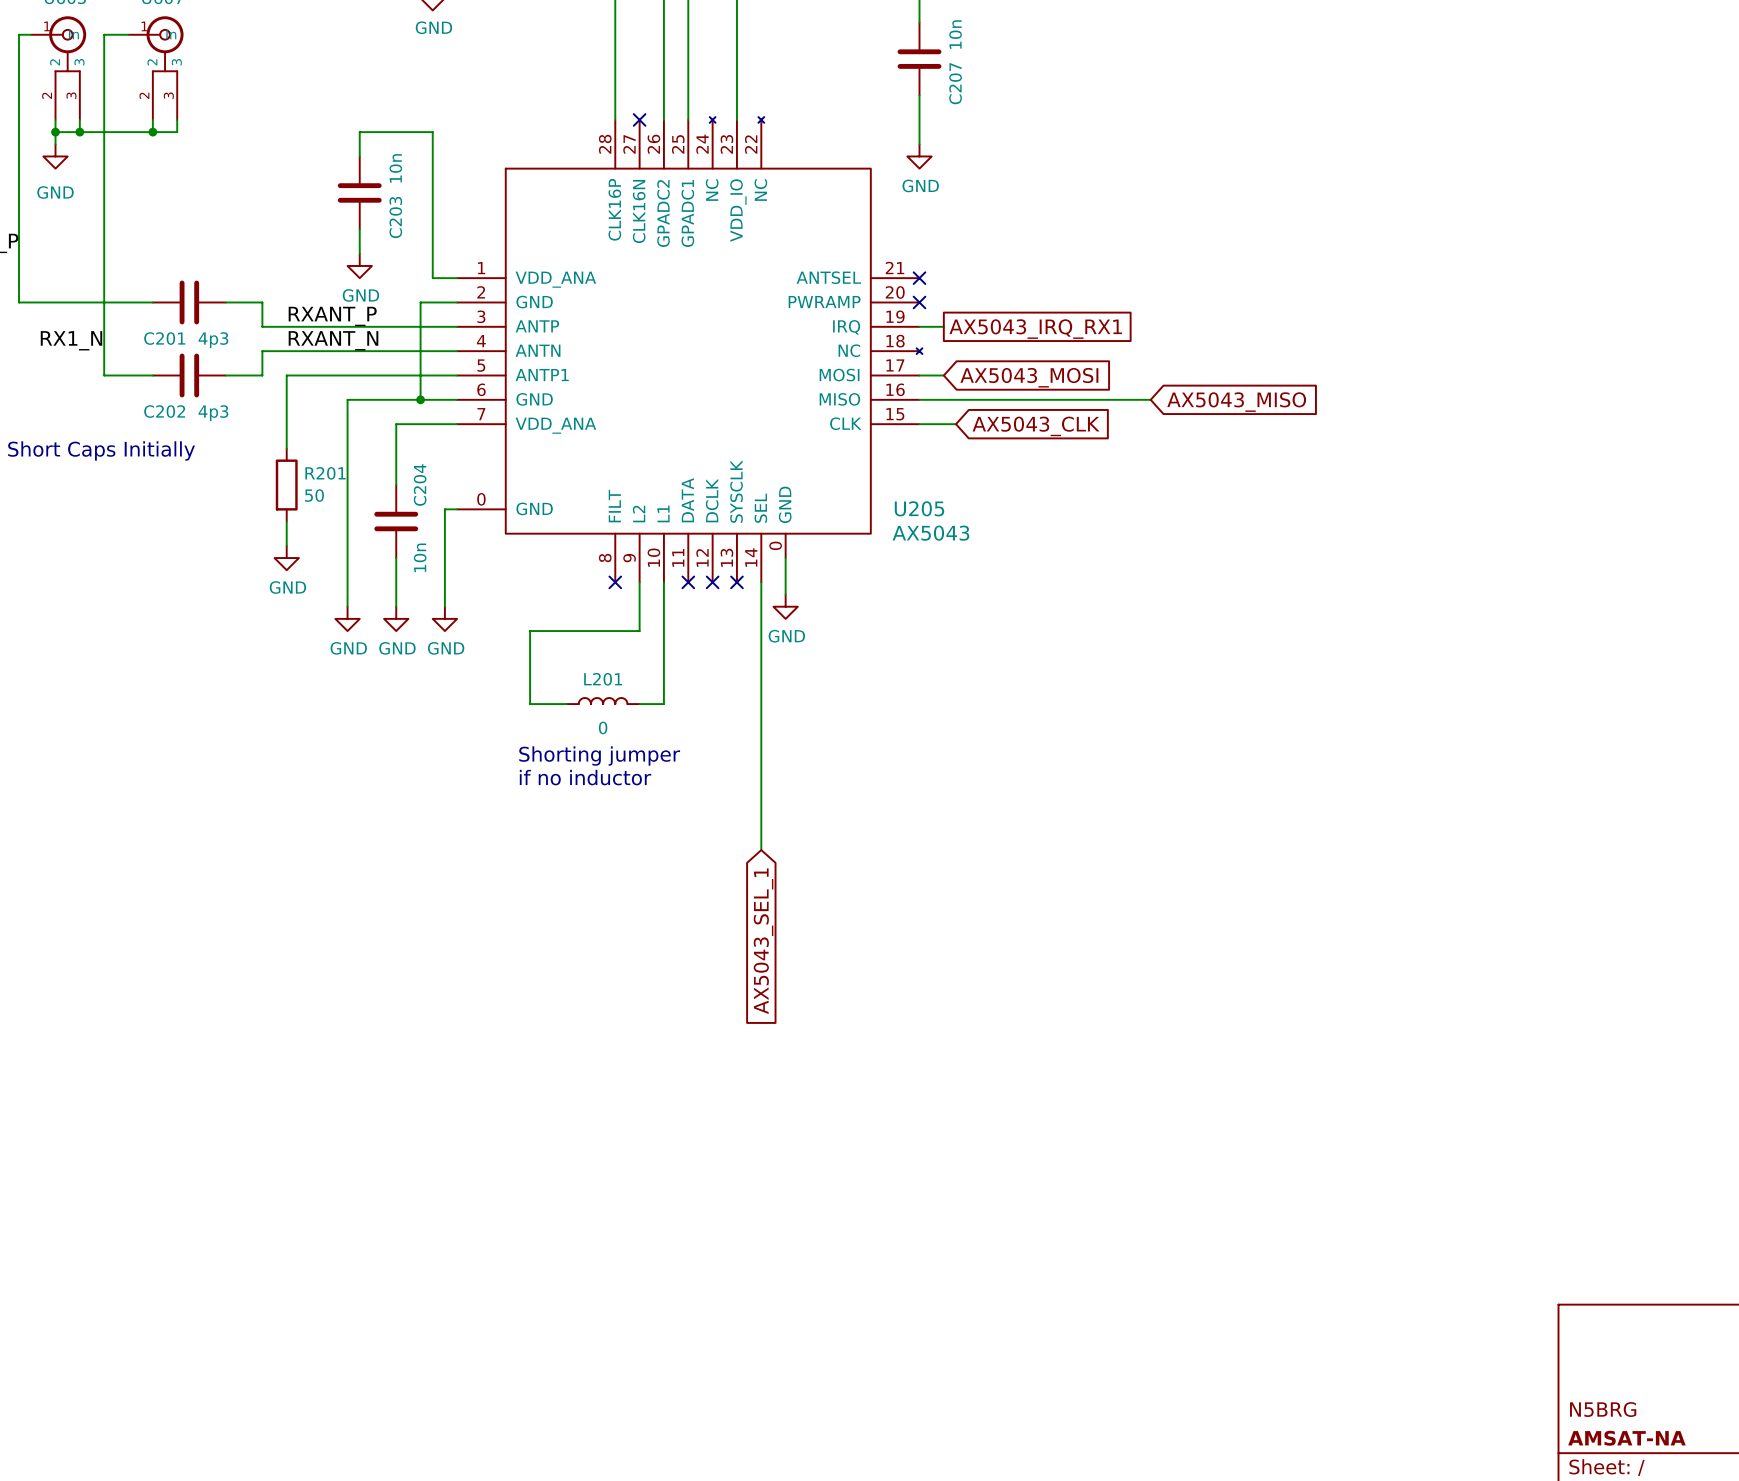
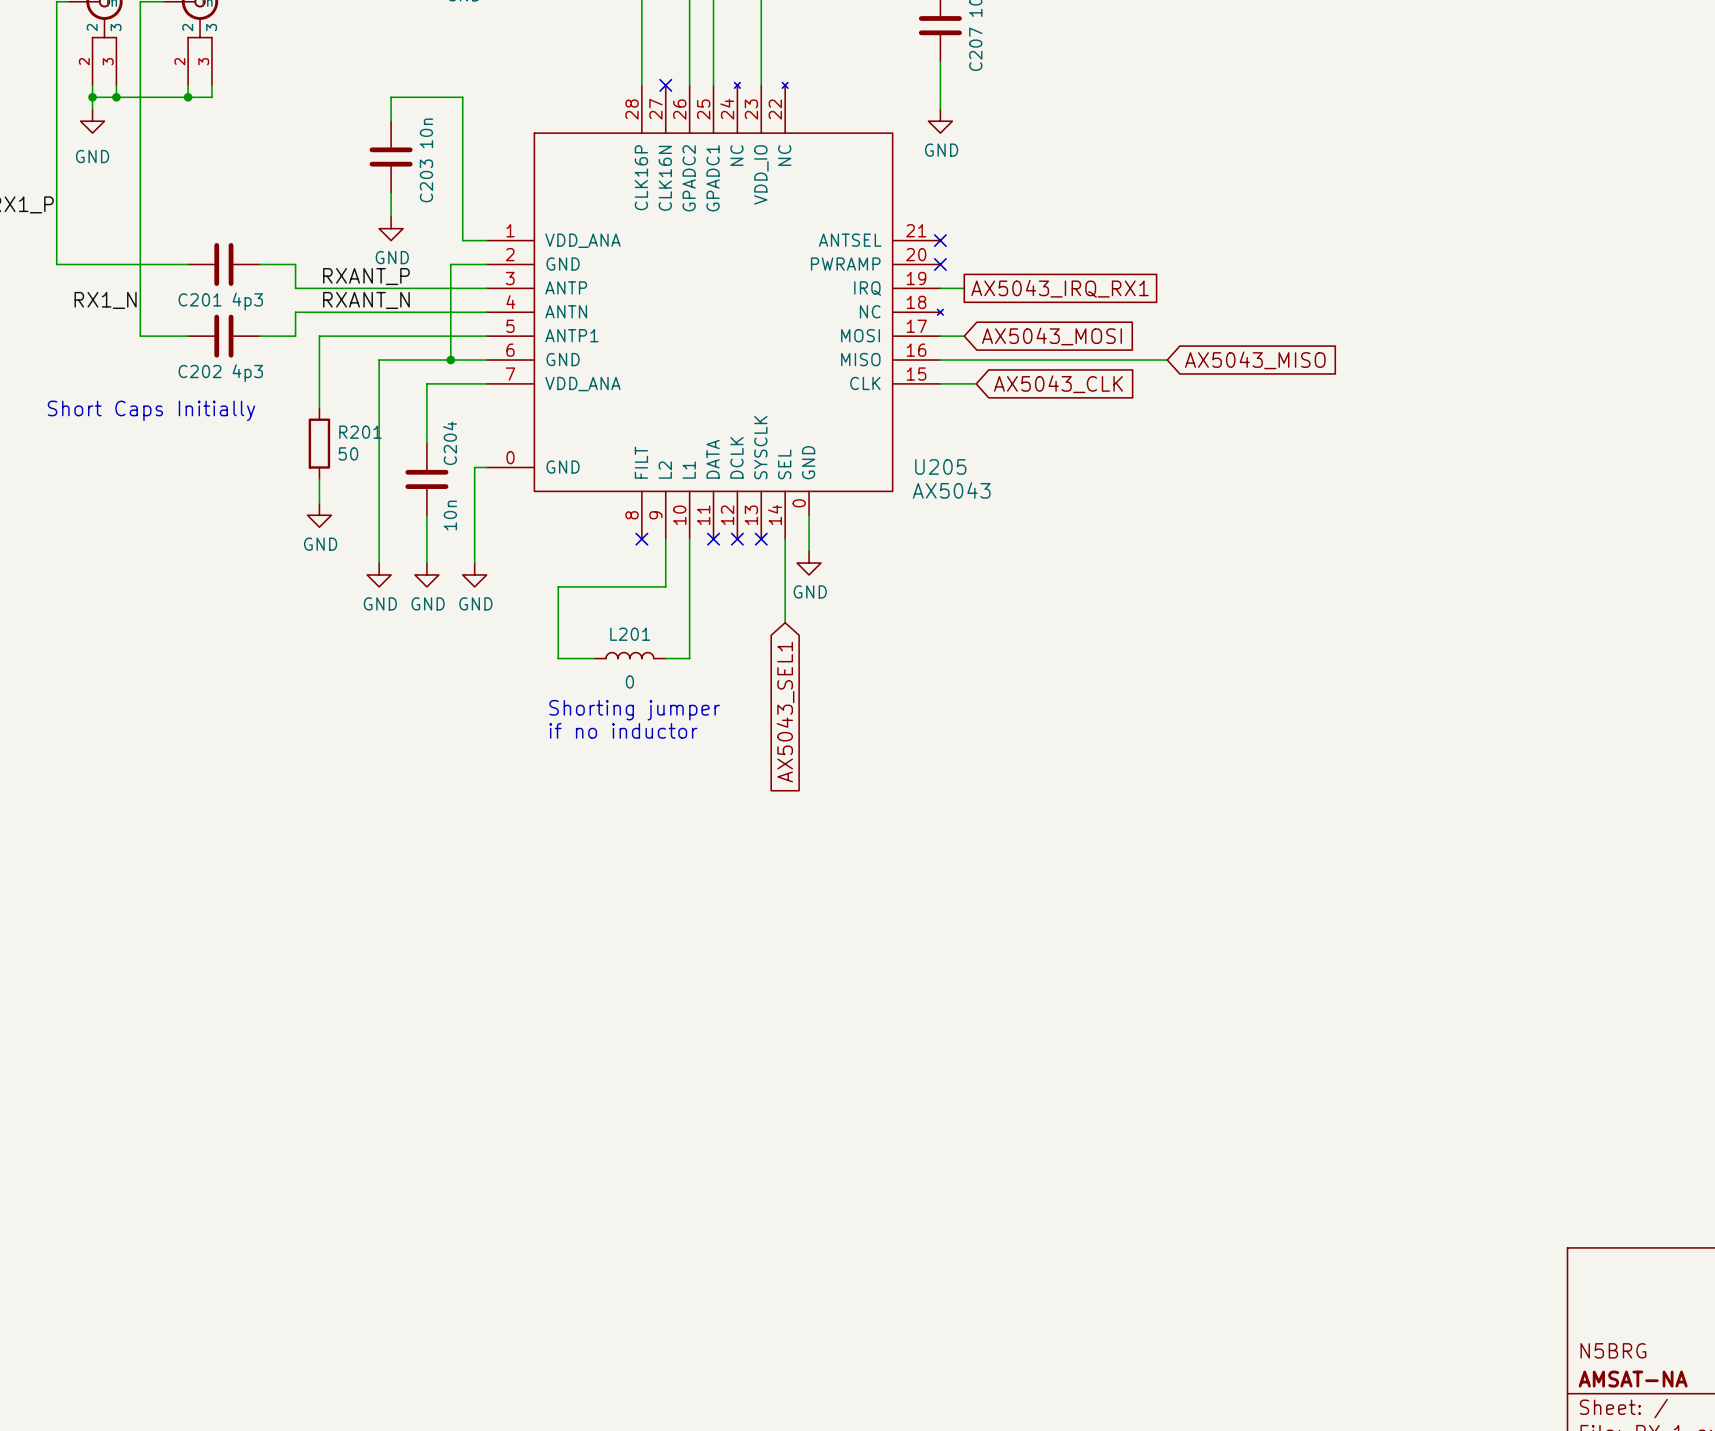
wire: (761, 667) (761, 850) -> none
global label: AX5043_SEL_1 (763, 941) -> AX5043_SEL1 (785, 712)

